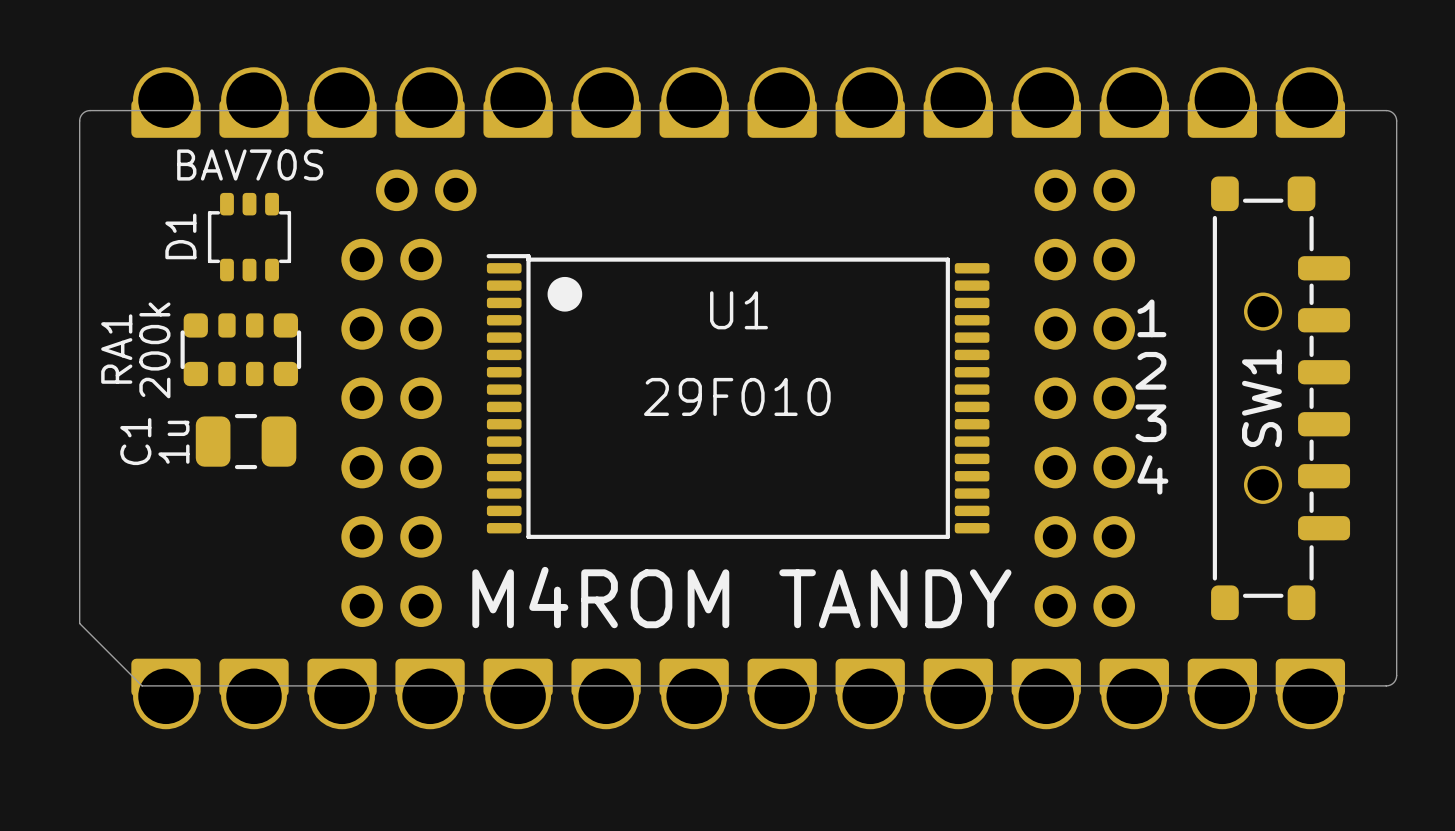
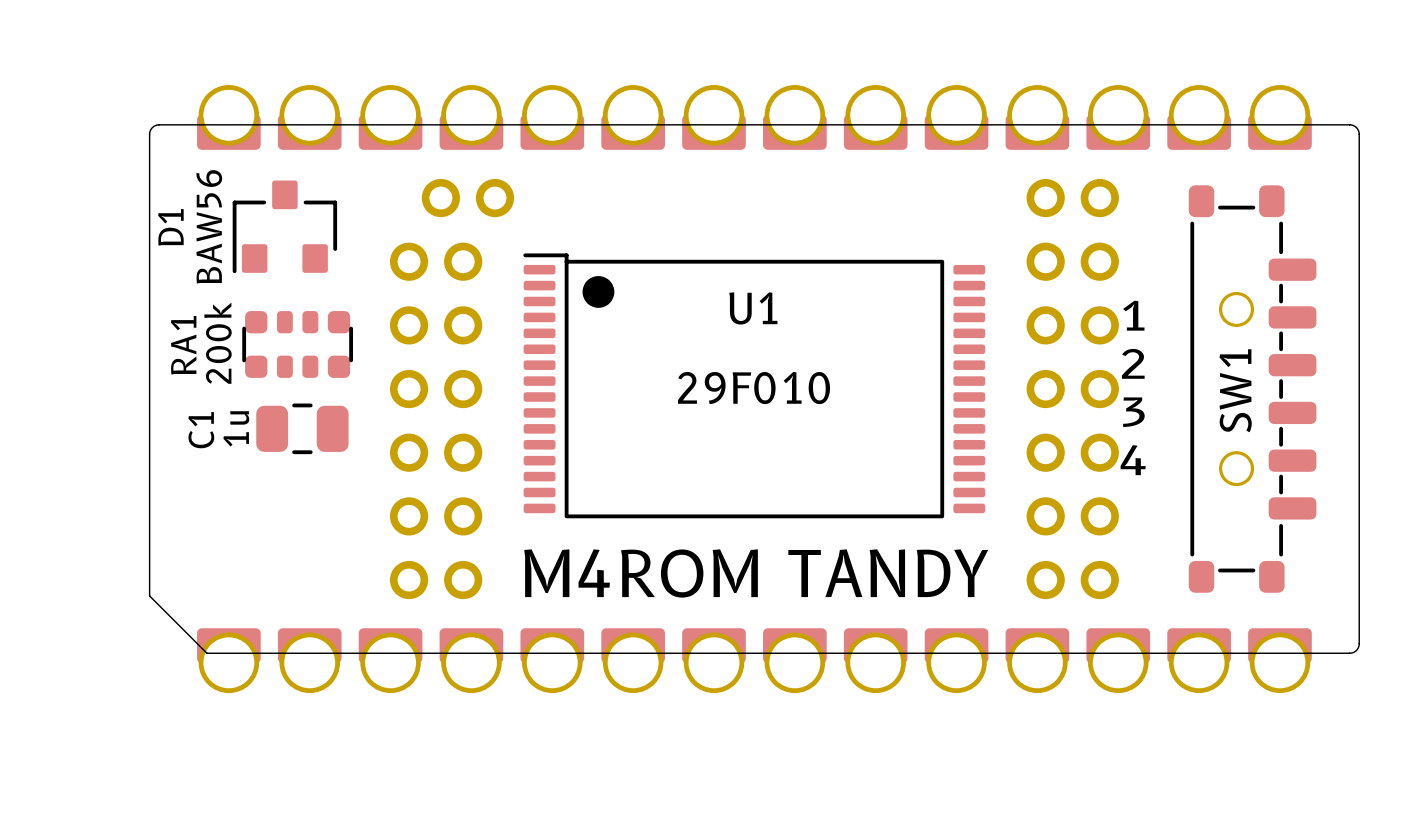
D1 value: BAV70S (250, 165) -> BAW56 (209, 226)
D1 footprint: [207, 192, 292, 282] -> [232, 180, 338, 274]
U1 footprint: [486, 254, 990, 539] -> [523, 253, 986, 519]

